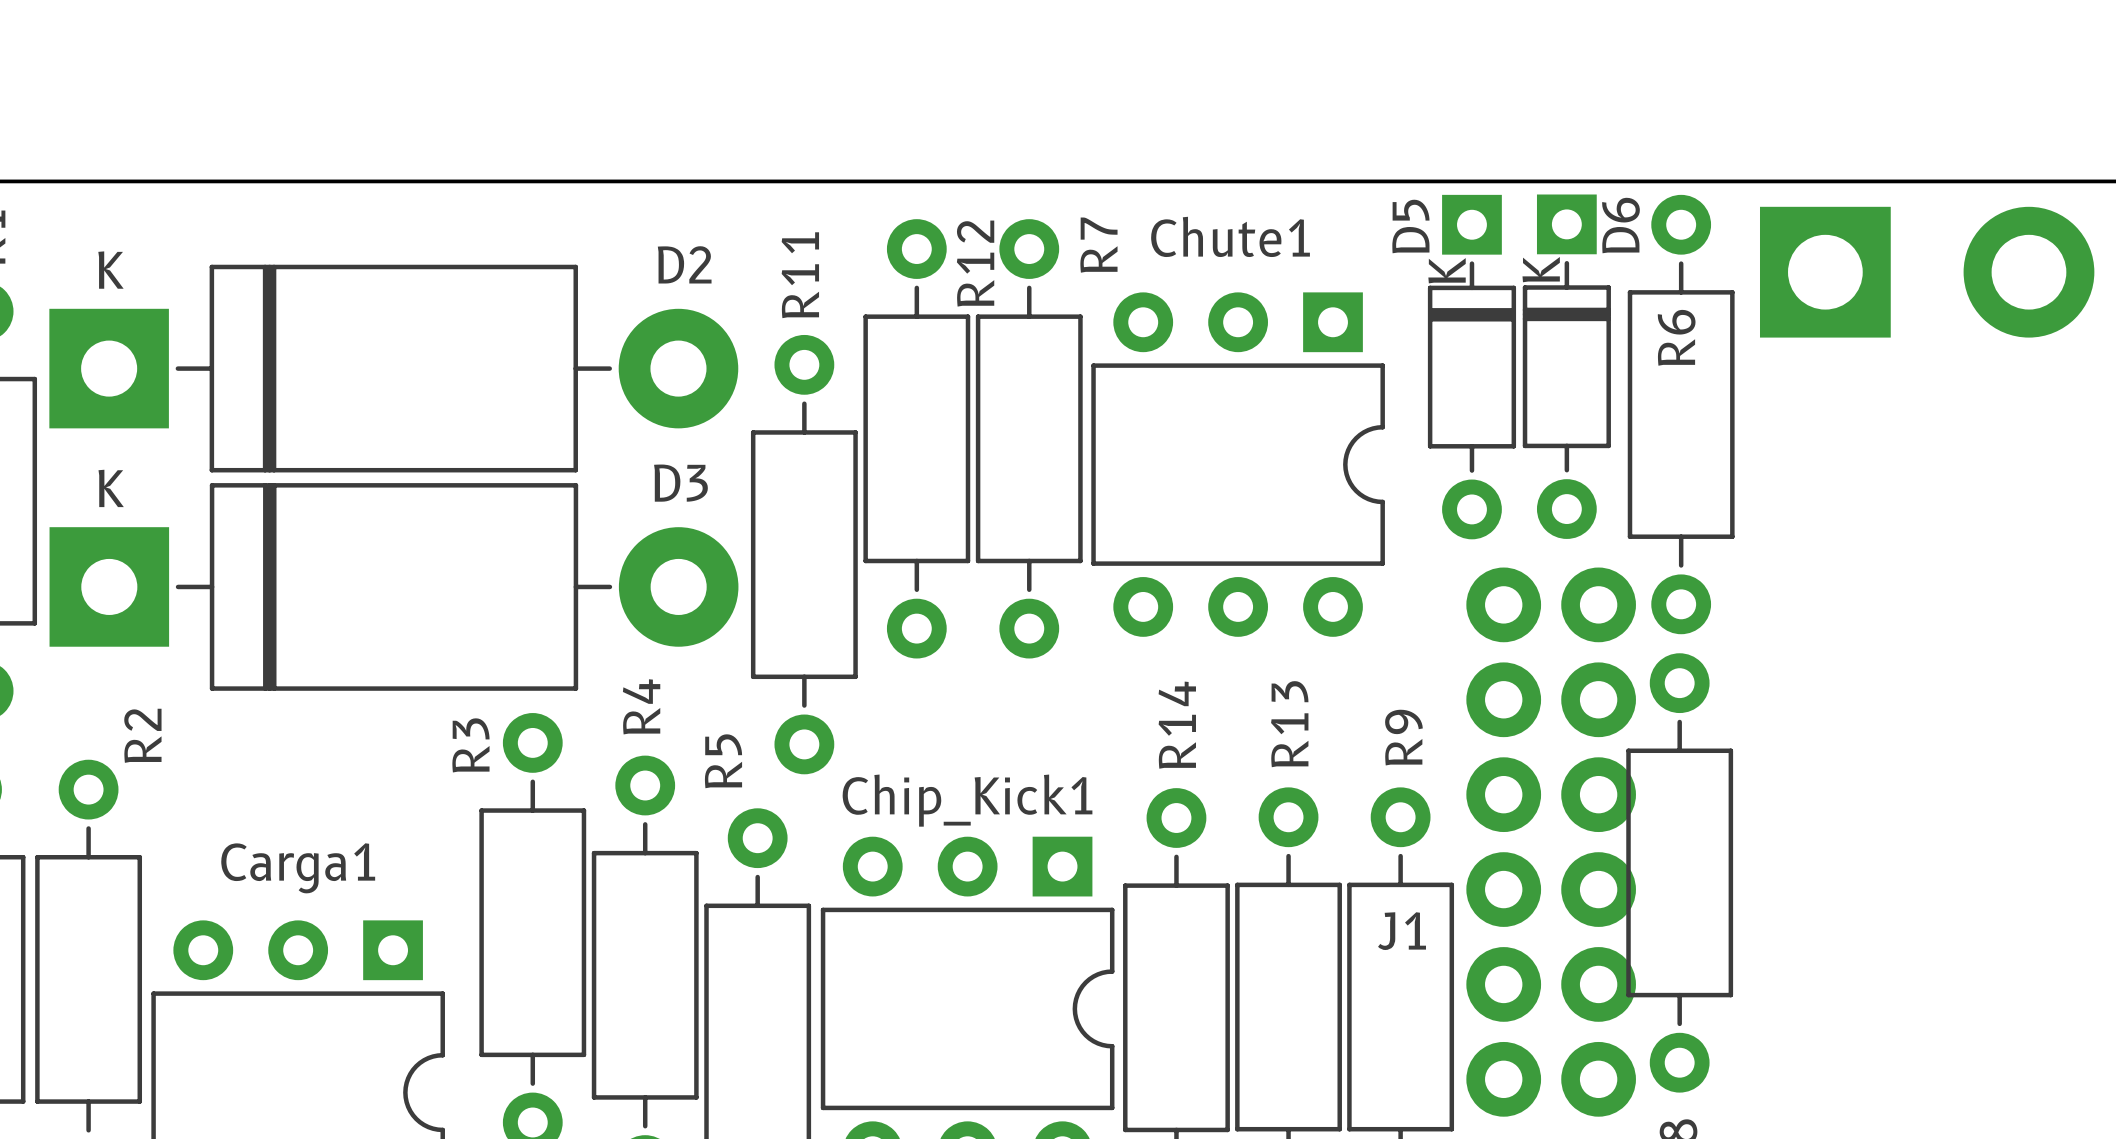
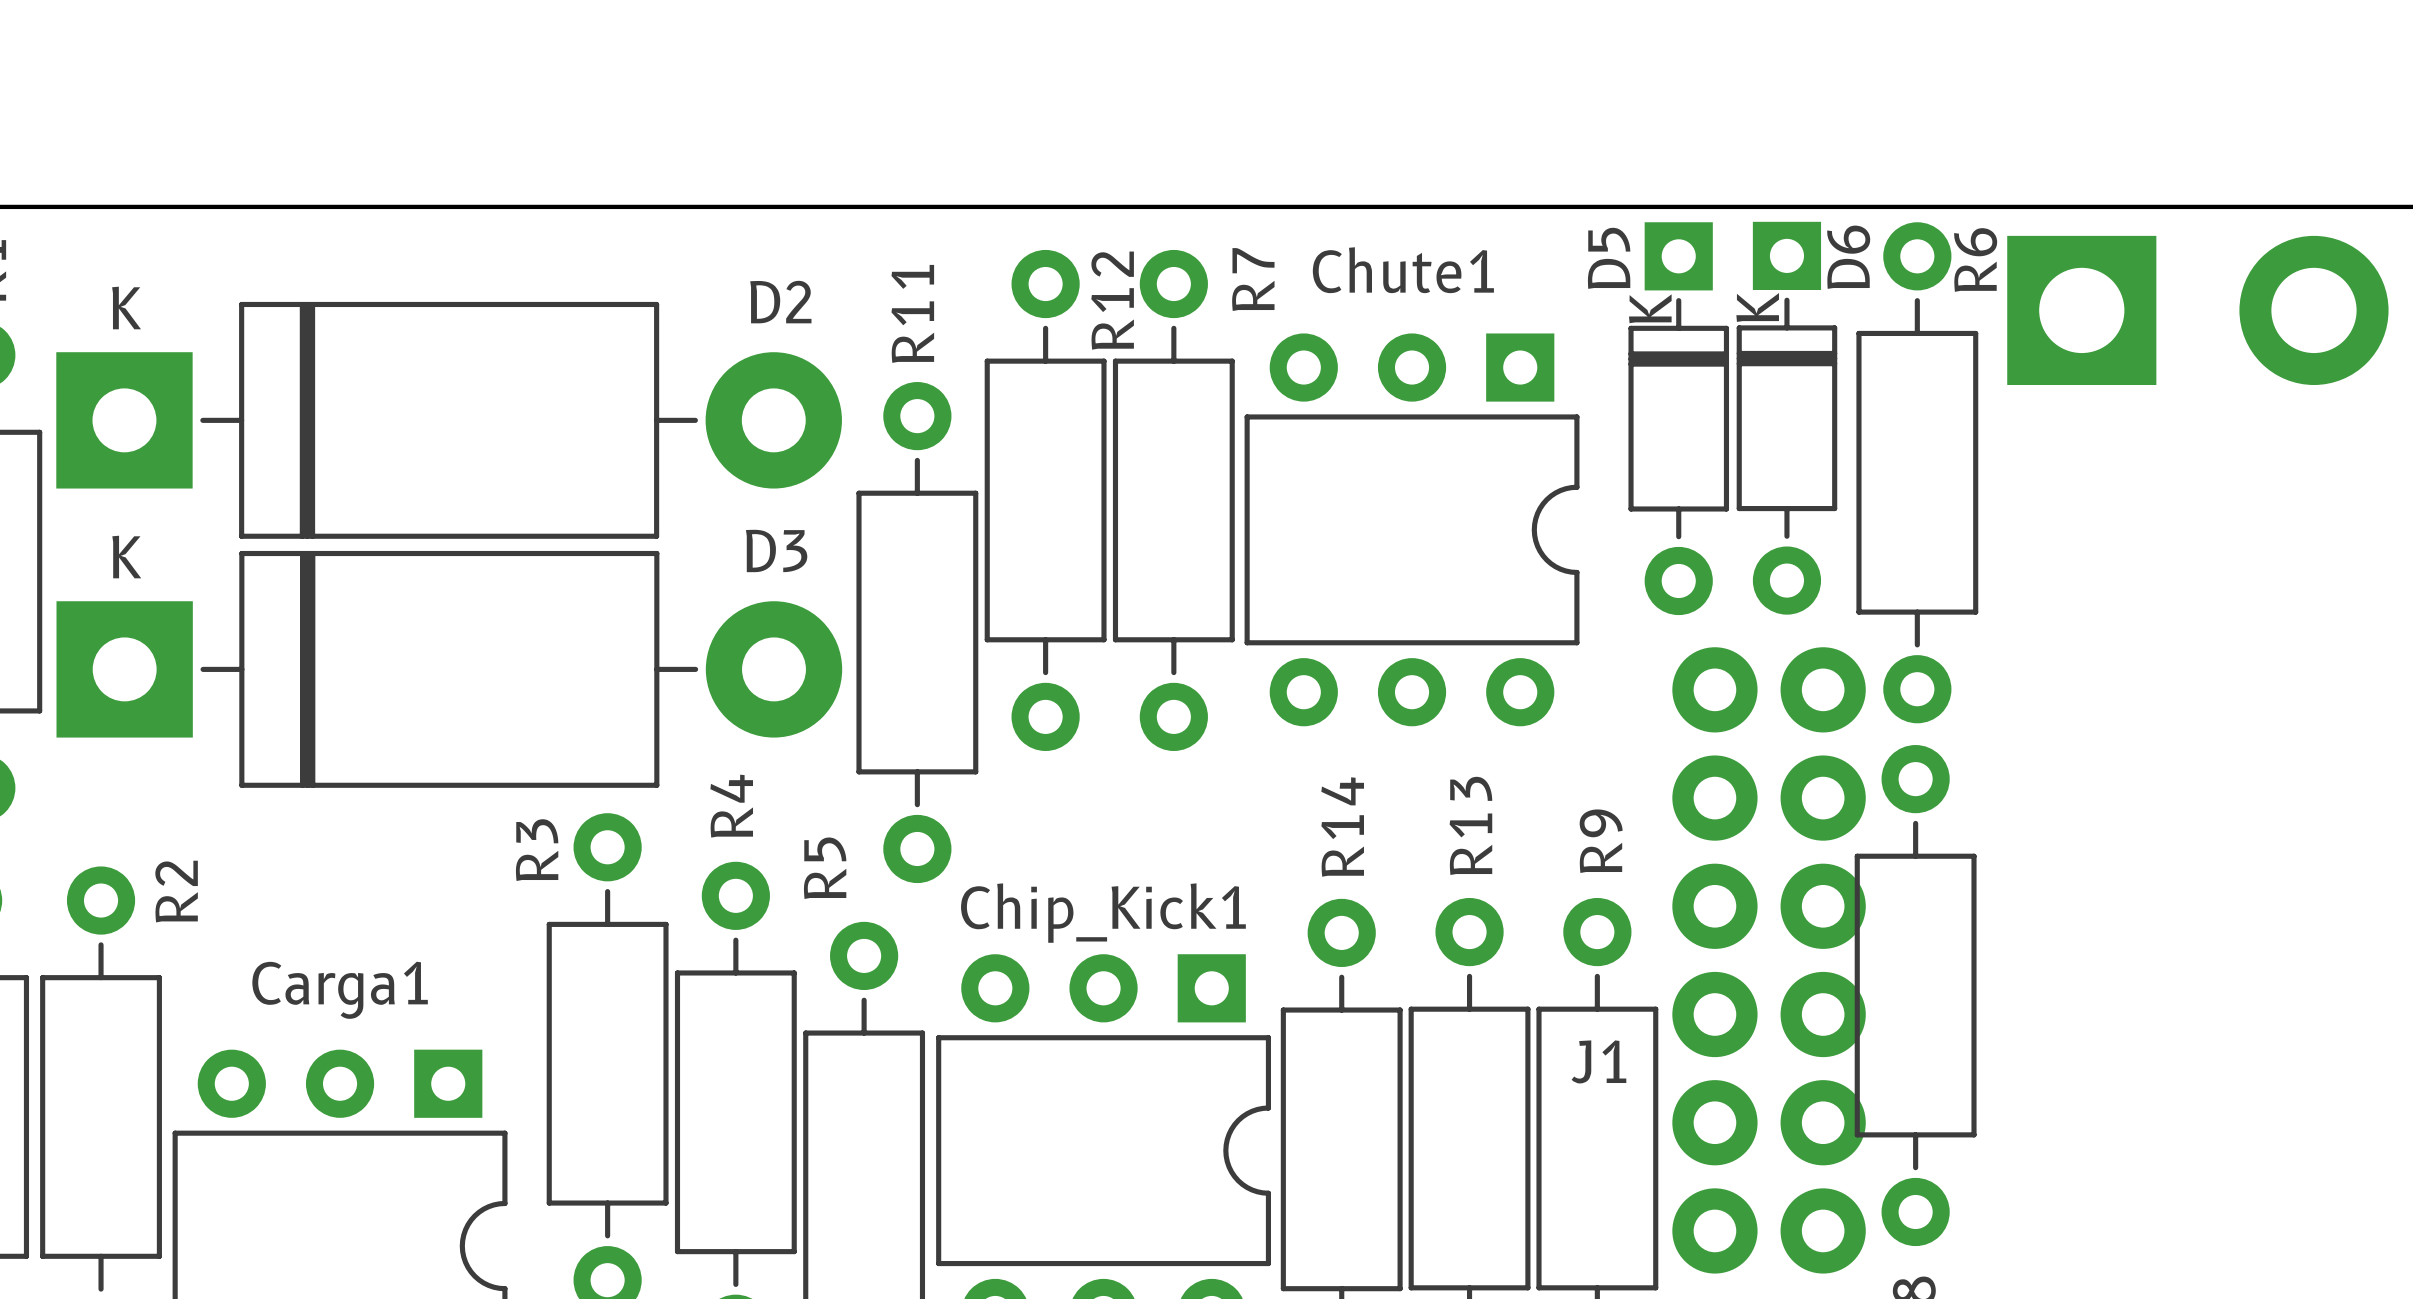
R6 name position: R6 (1676, 337) -> R6 (1975, 259)
R2 name position: R2 (142, 735) -> R2 (176, 891)

